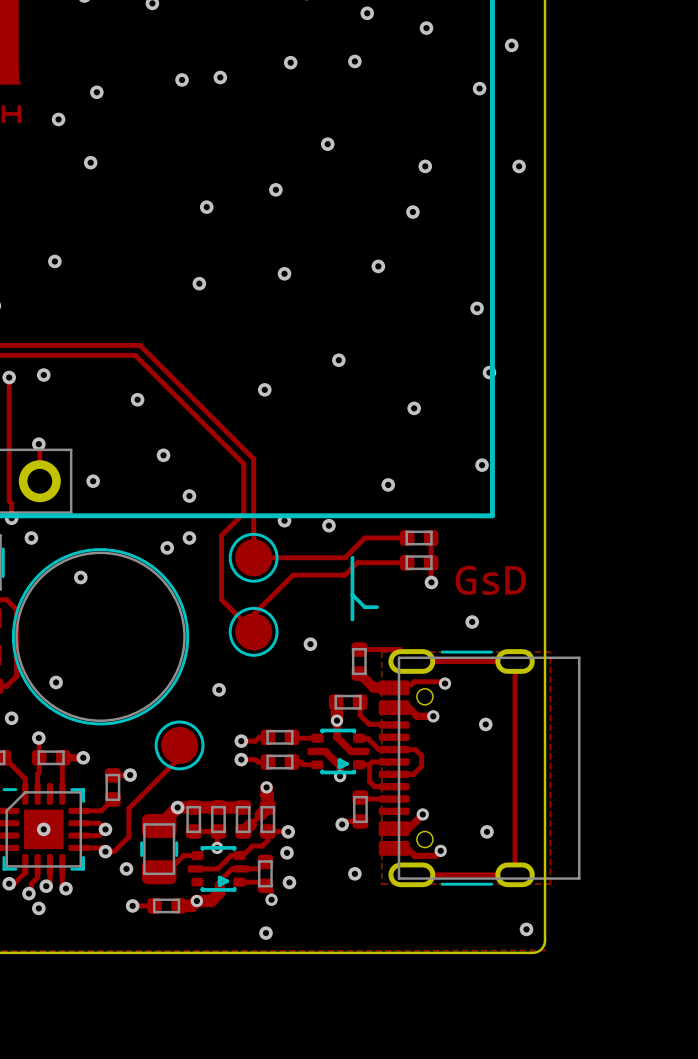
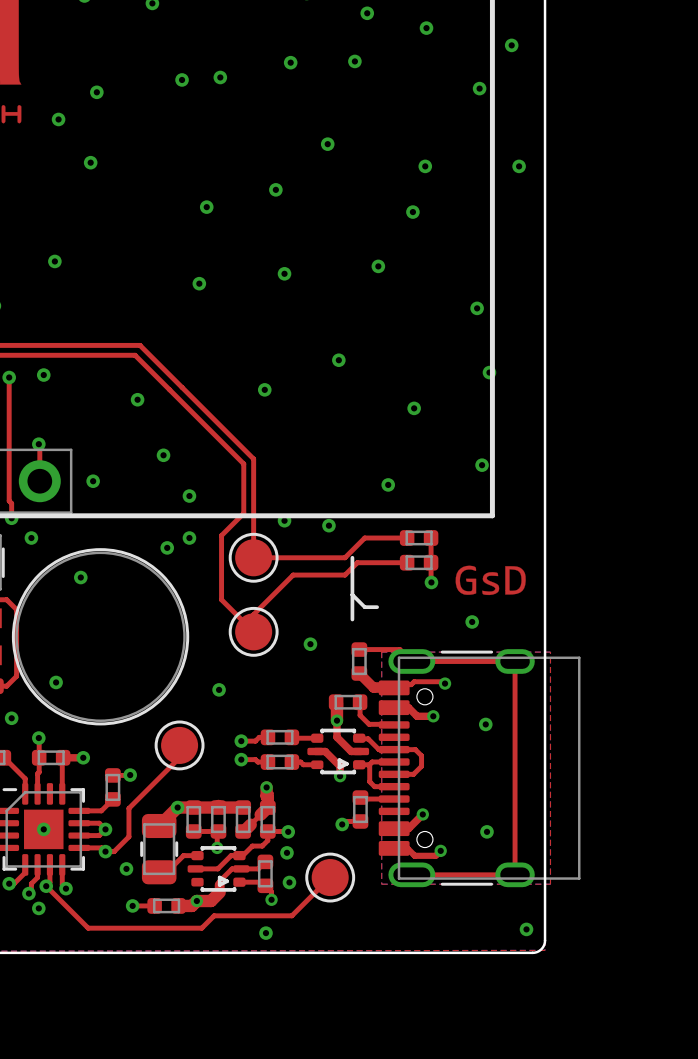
via: (354, 873) -> none
top track: none -> (330, 877) (291, 915) (214, 915) (201, 928) (88, 928) (46, 886)
part: none -> (330, 877)

